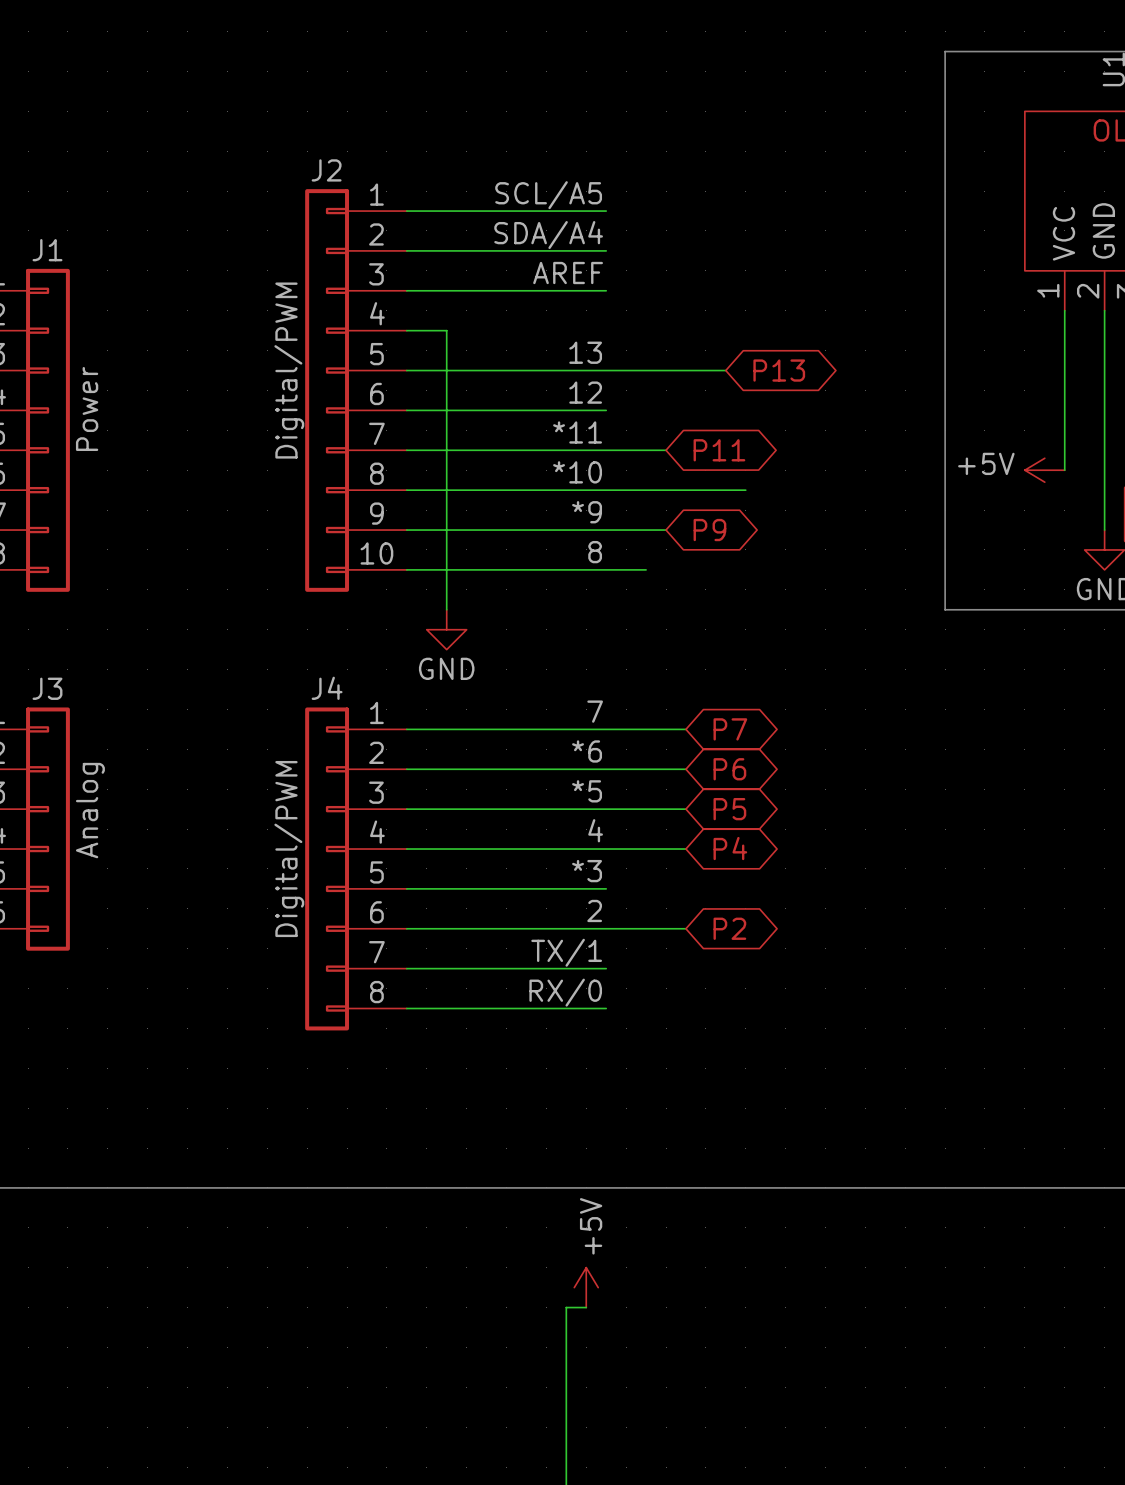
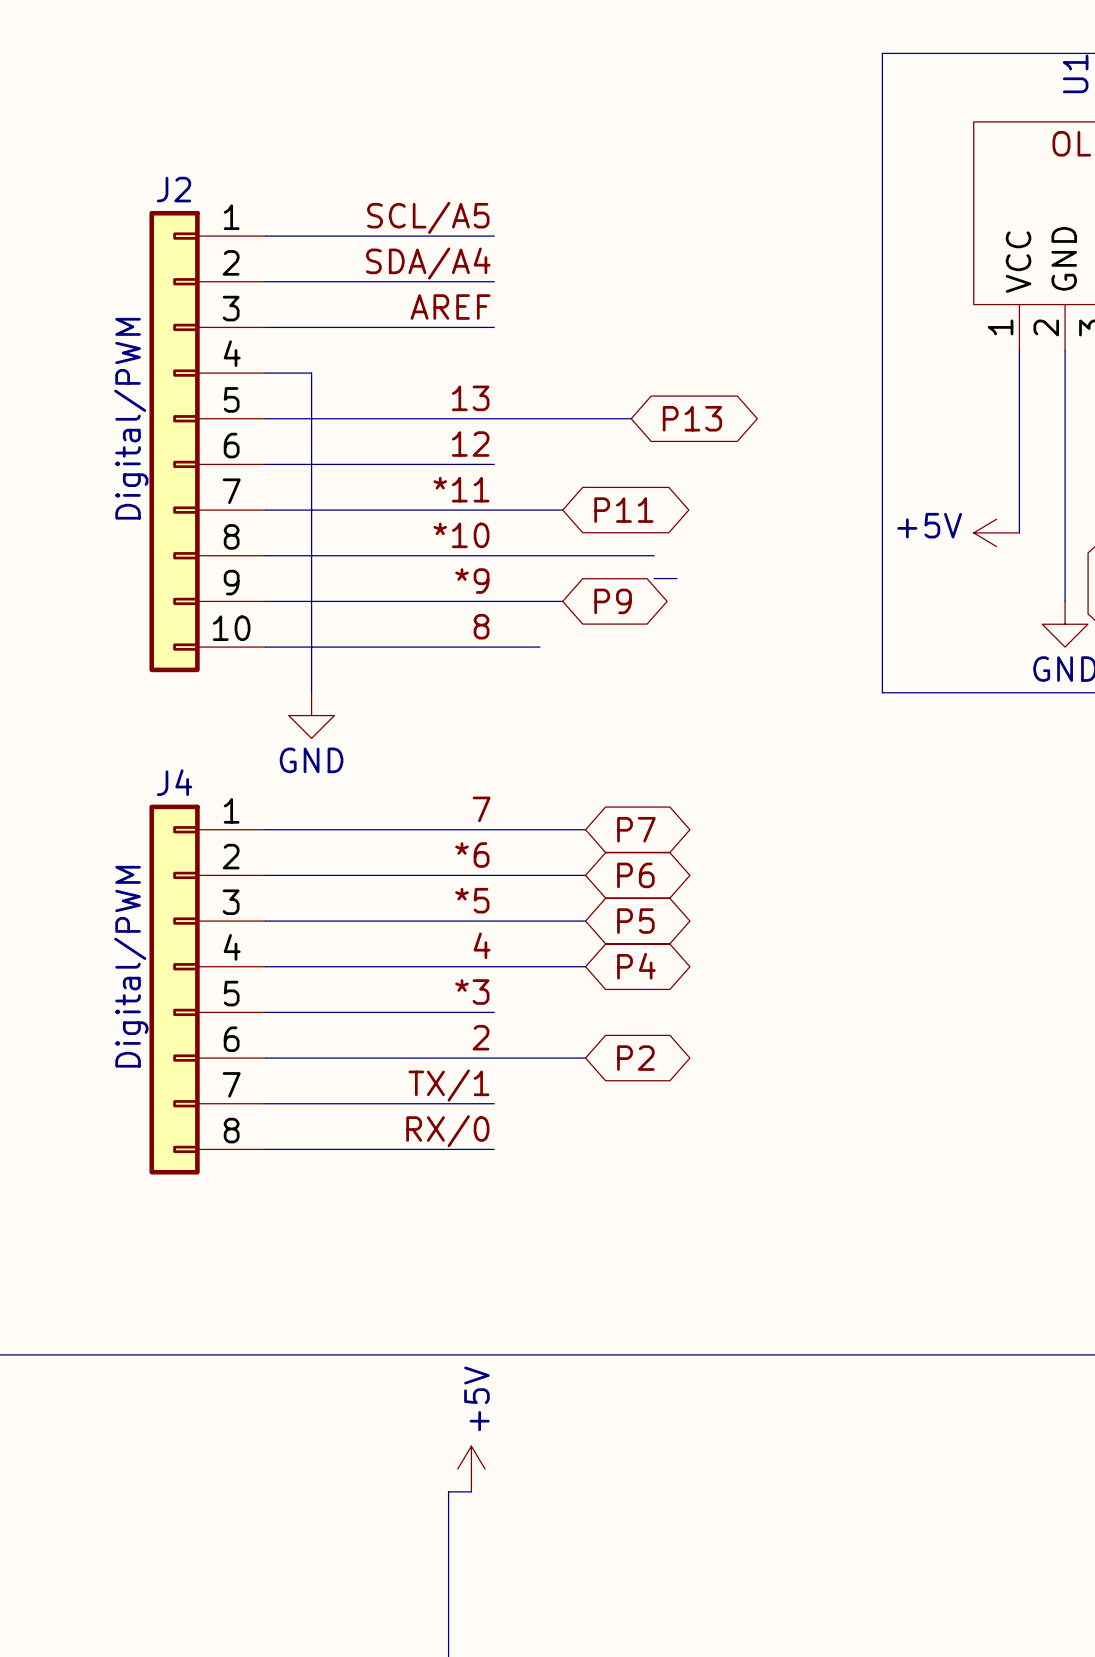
wire: none -> (654, 578) (676, 578)

